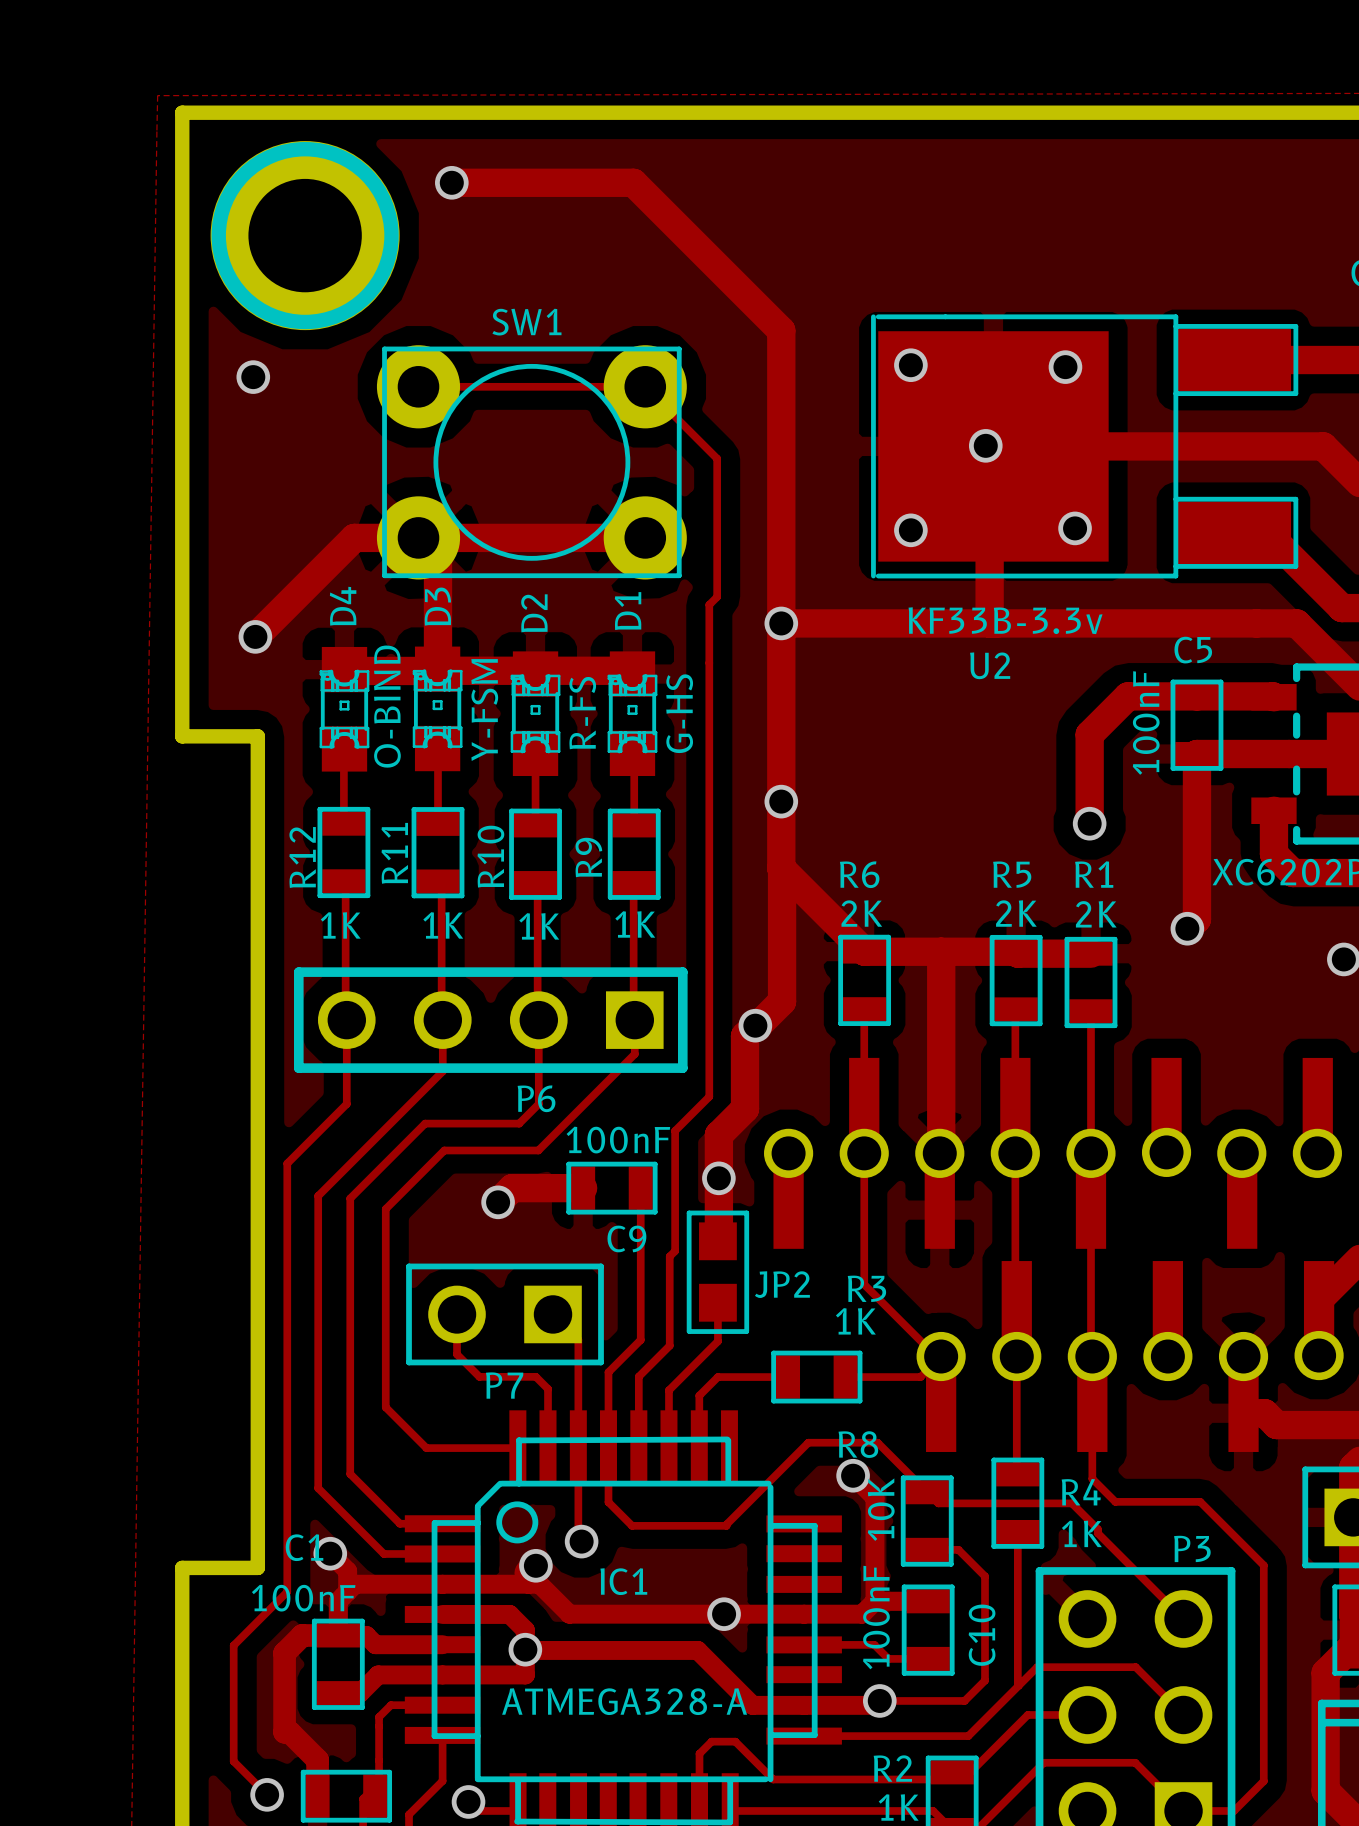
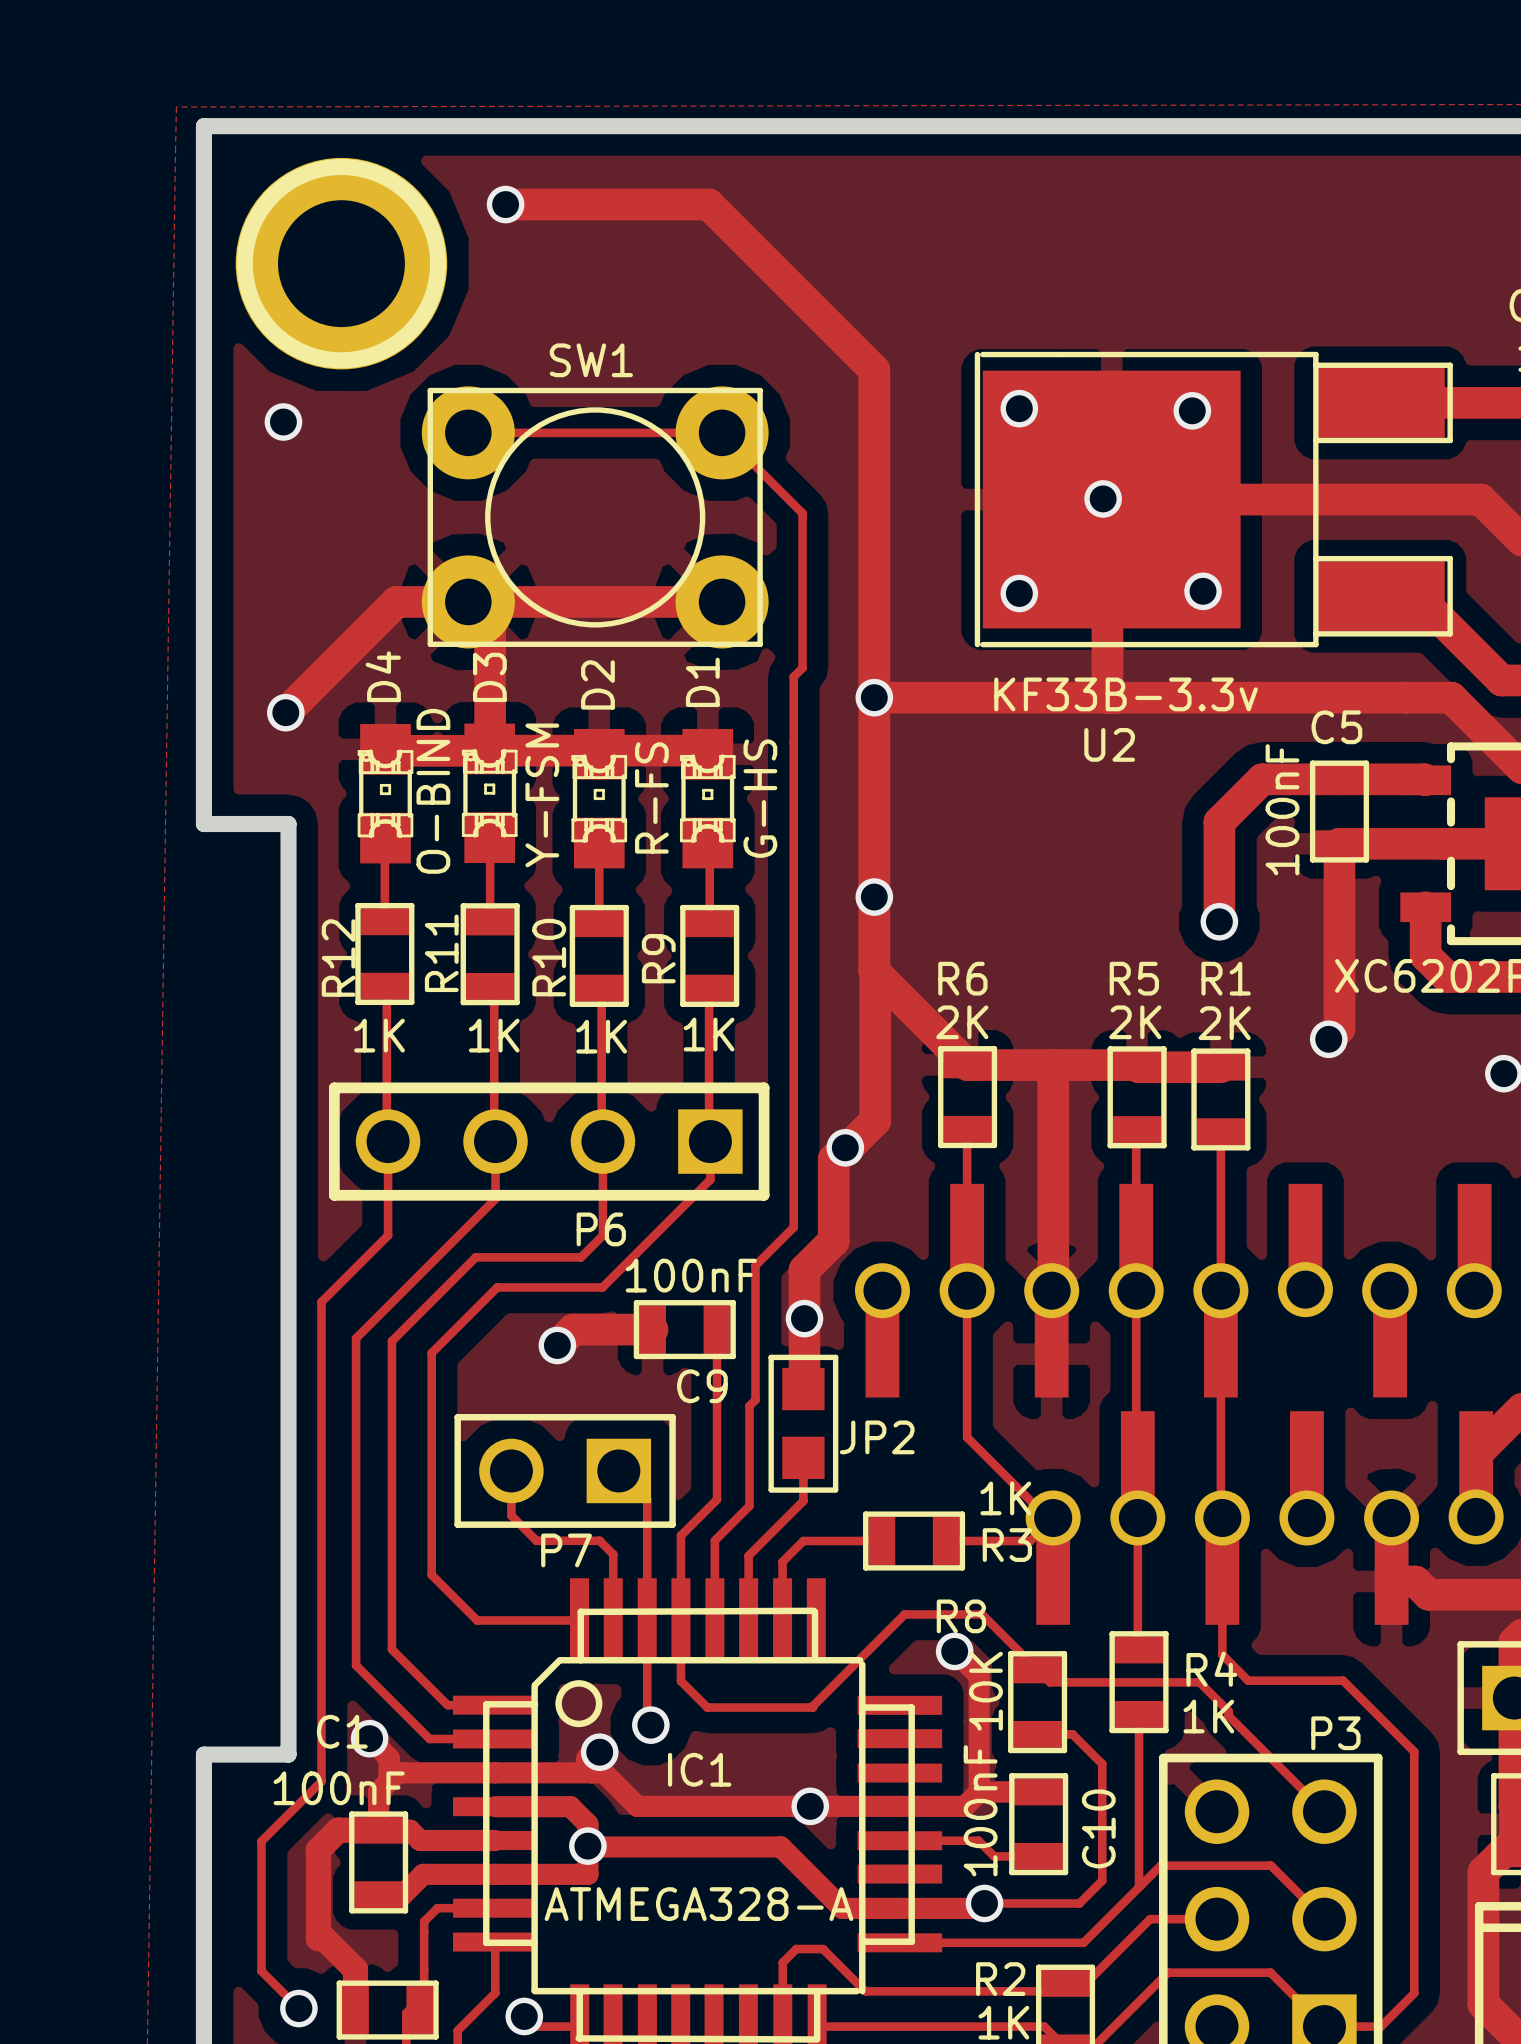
R3 name position: R3 (866, 1288) -> R3 (1007, 1545)
R3 value position: 1K (855, 1321) -> 1K (1005, 1498)

